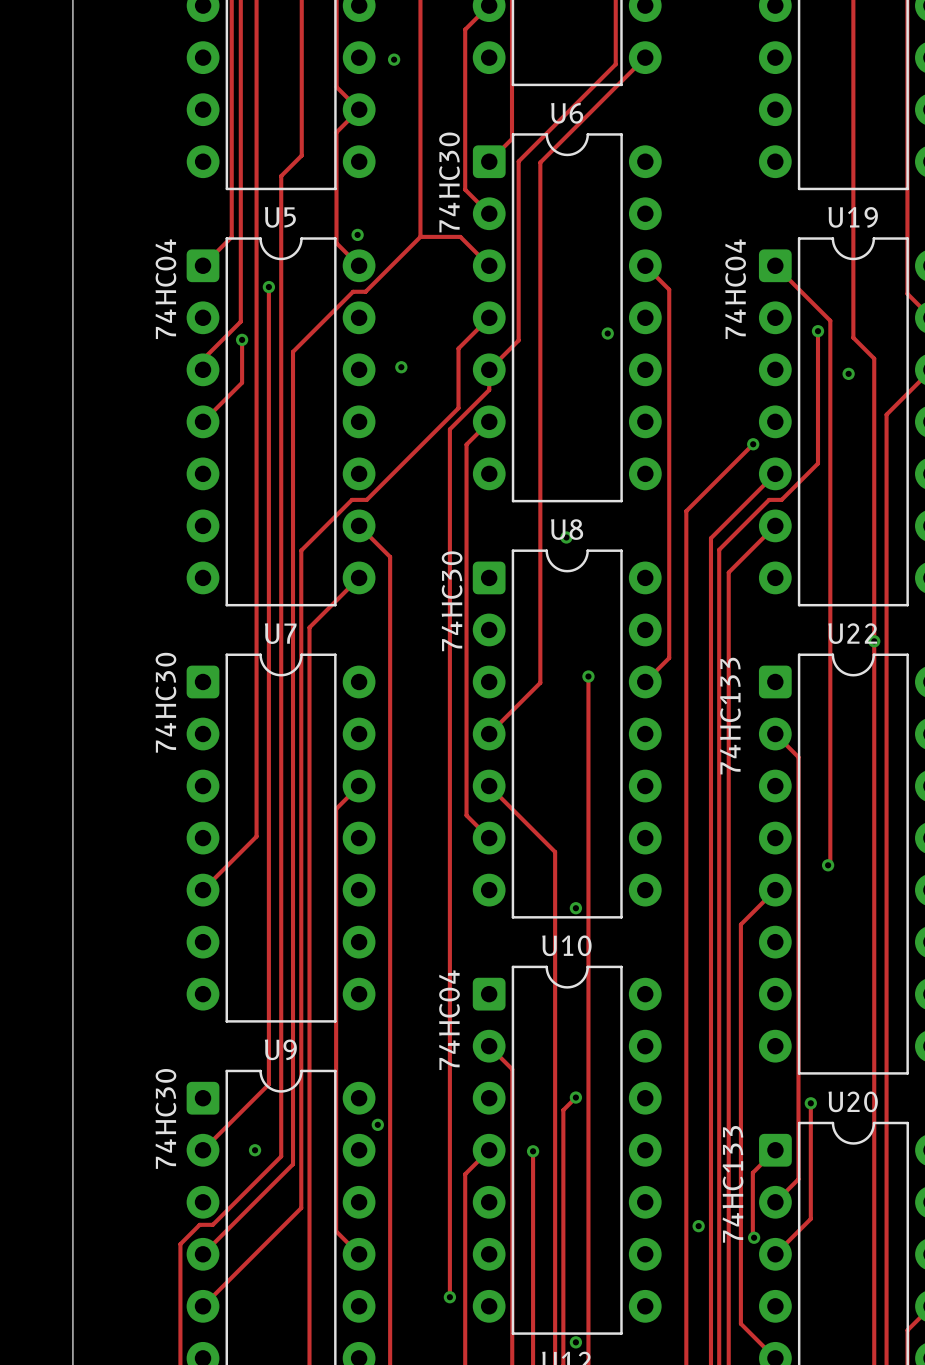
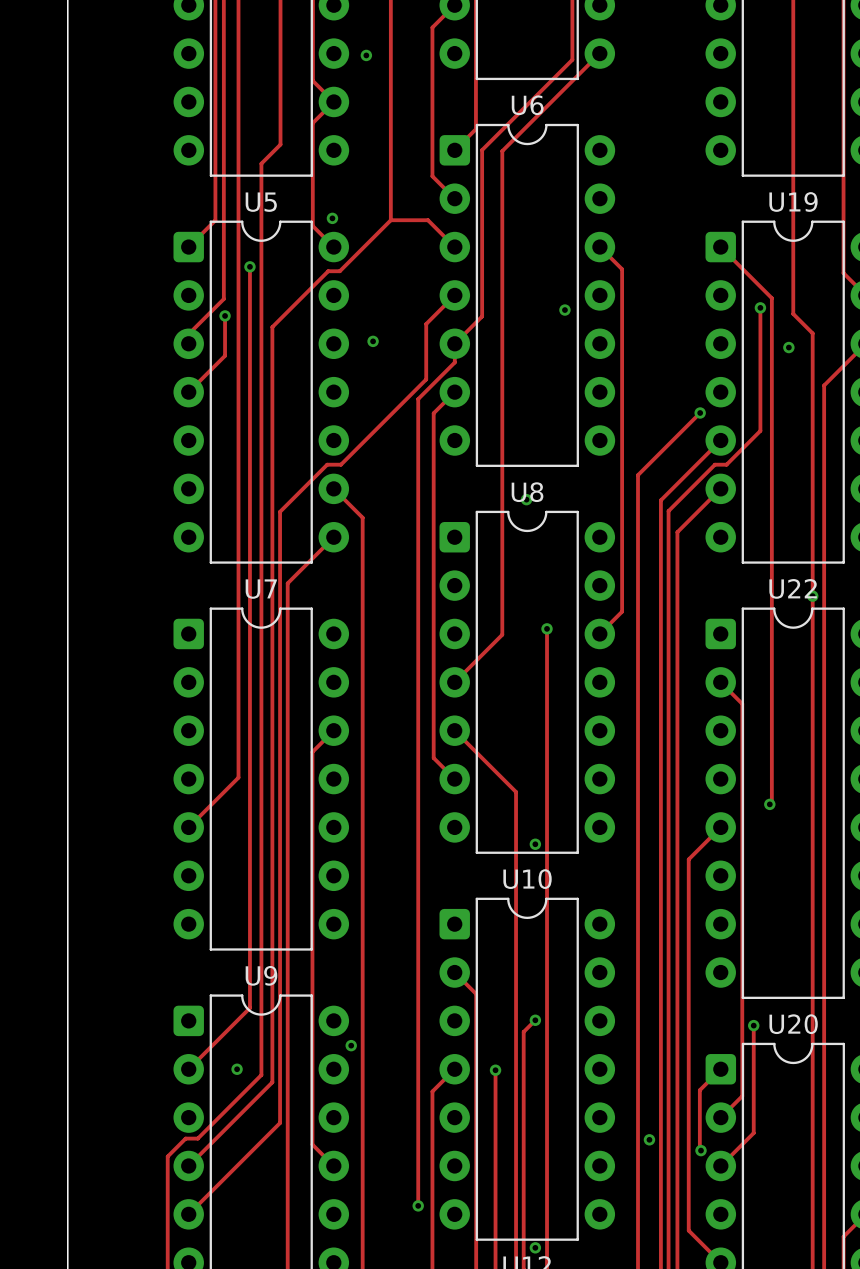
U6 value: 74HC30 (449, 182) -> none
U5 value: 74HC04 (165, 289) -> none
U19 value: 74HC04 (735, 289) -> none
U8 value: 74HC30 (452, 601) -> none
U7 value: 74HC30 (165, 702) -> none
U22 value: 74HC133 (730, 716) -> none
U10 value: 74HC04 (449, 1020) -> none
U9 value: 74HC30 (165, 1118) -> none
U20 value: 74HC133 (733, 1184) -> none

